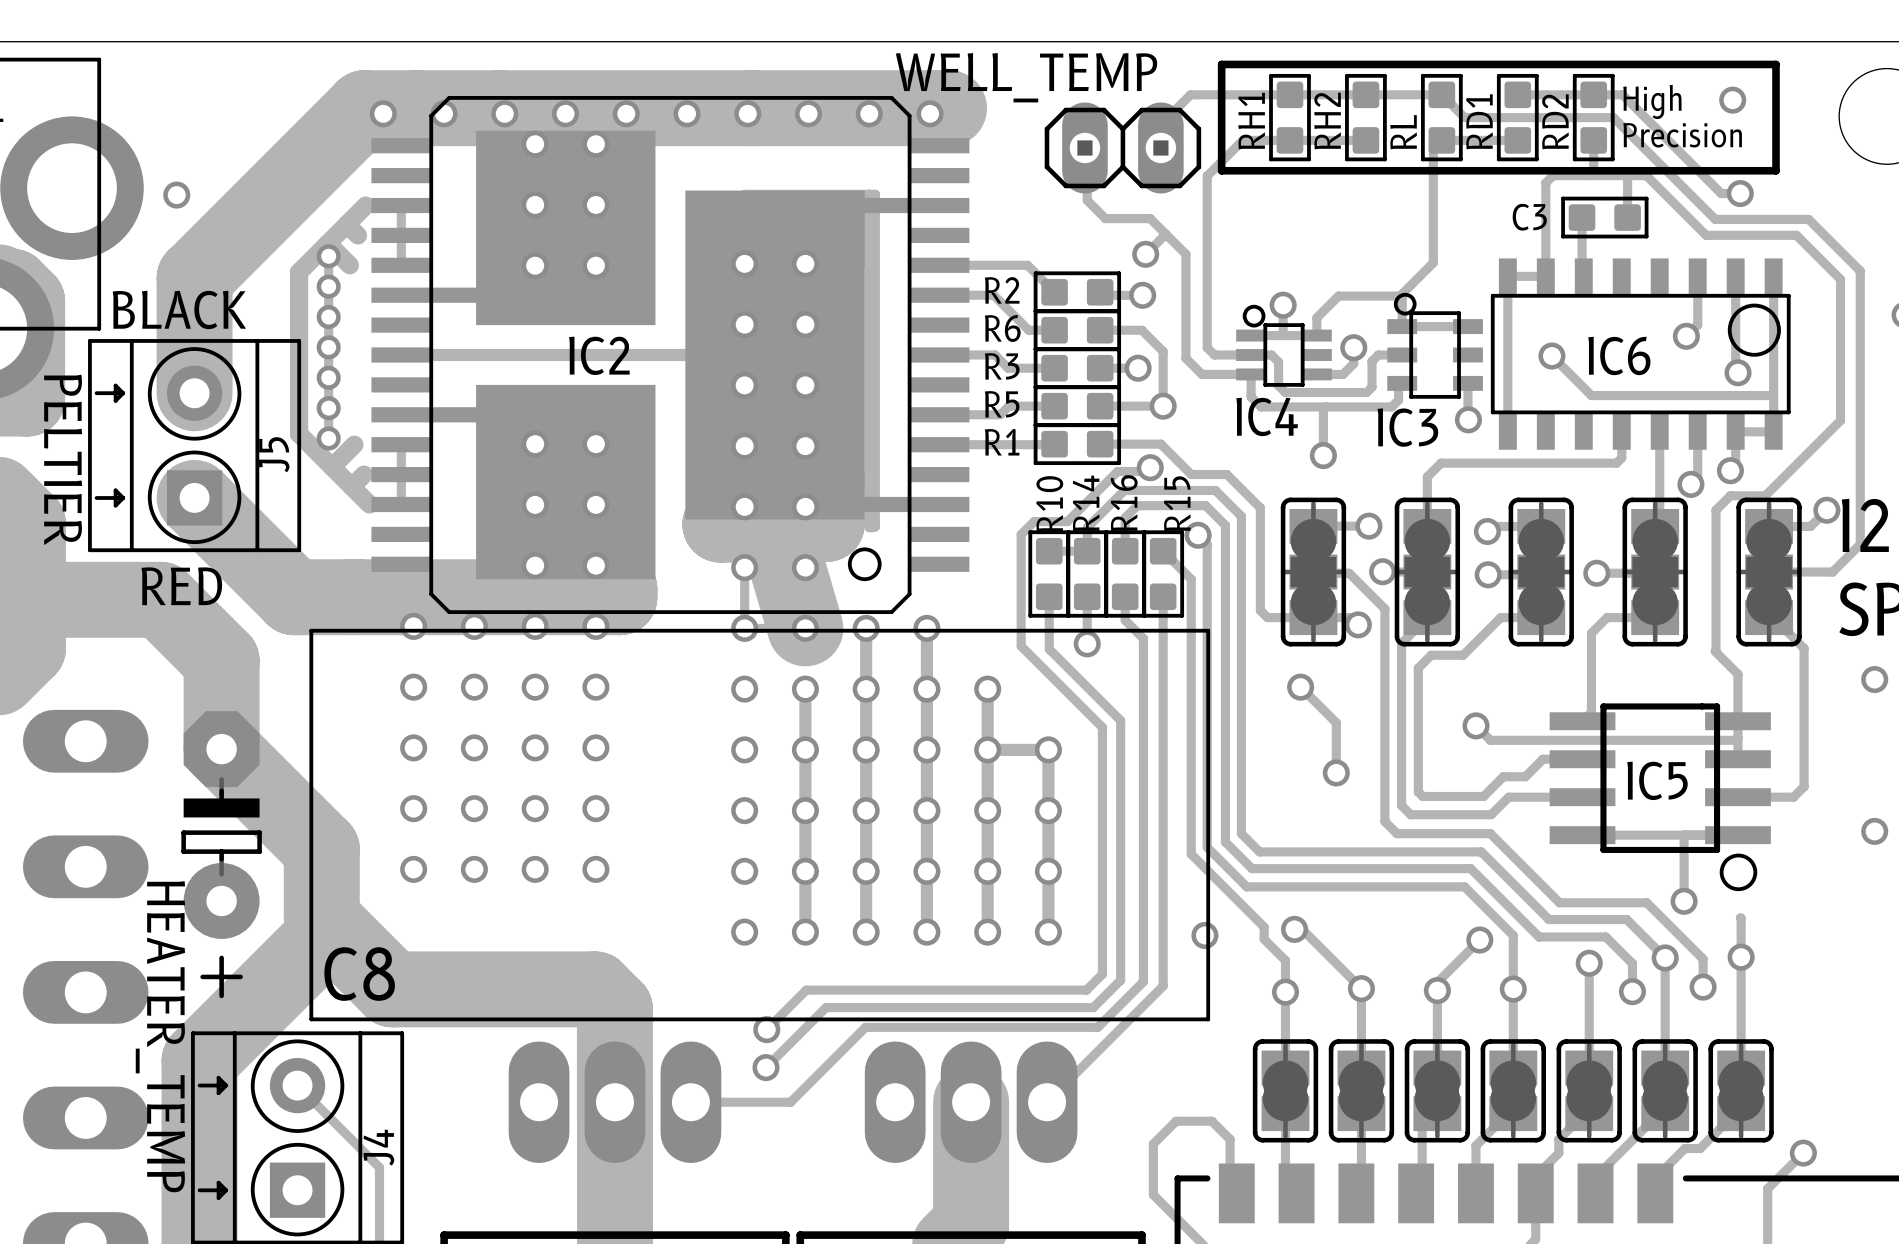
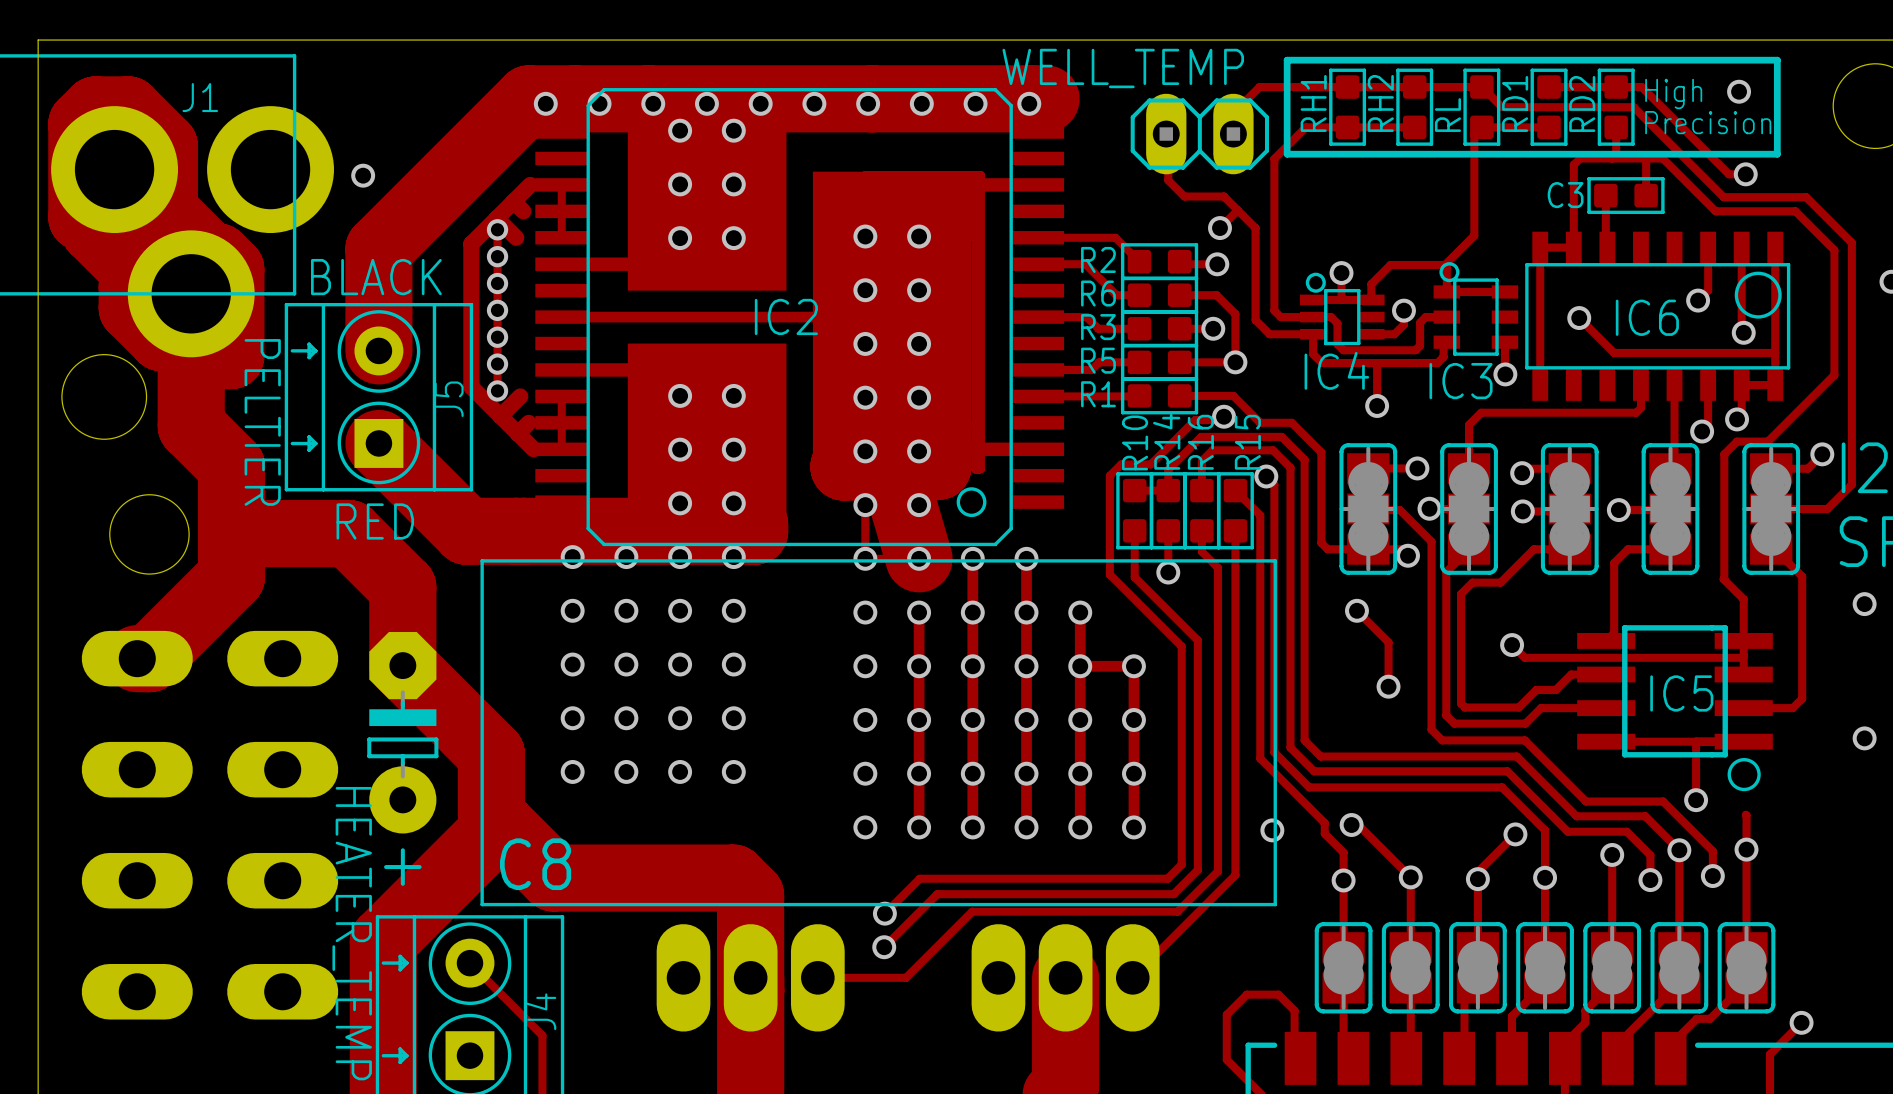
IC2 name position: IC2 (599, 355) -> IC2 (786, 316)

